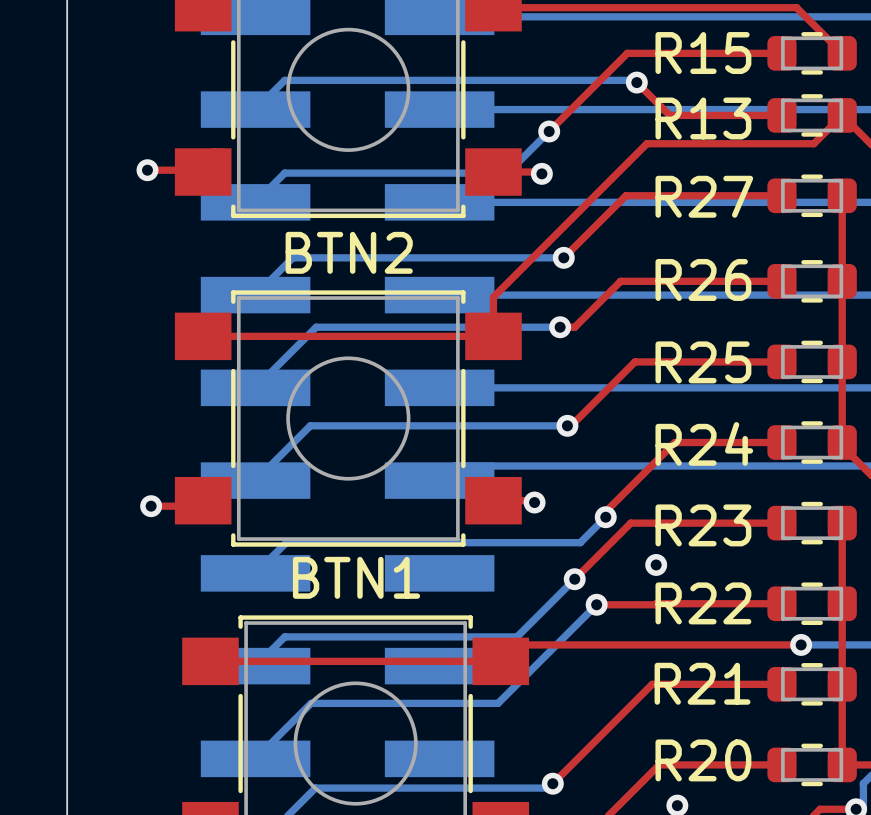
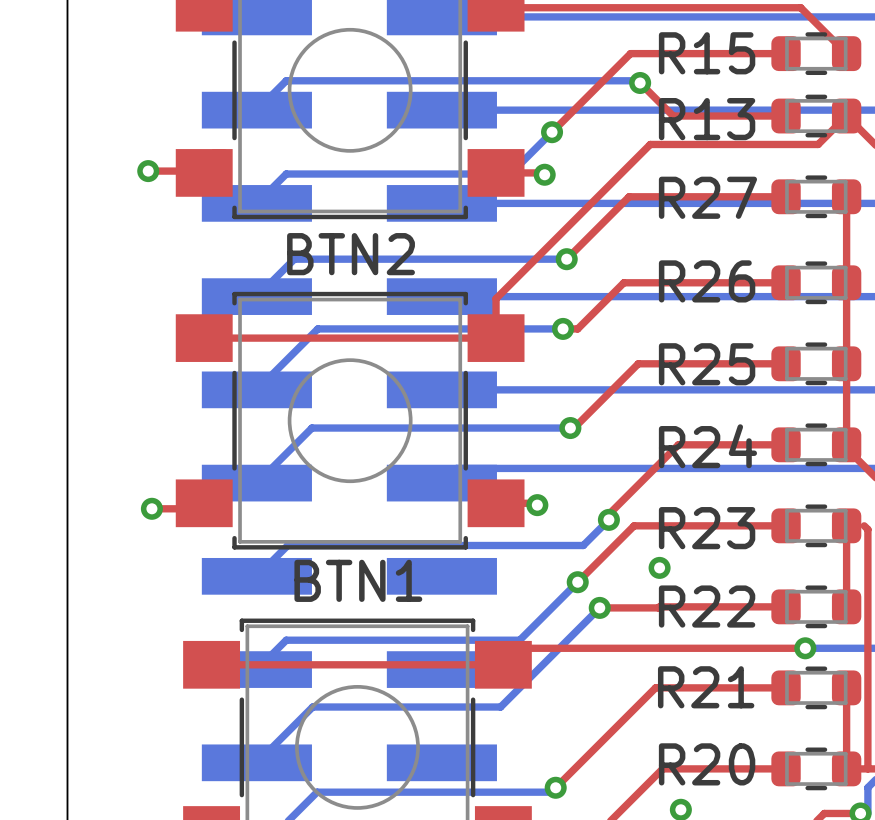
top track: none -> (864, 525) (867, 529) (867, 768)
top track: (842, 603) (842, 684) -> none

